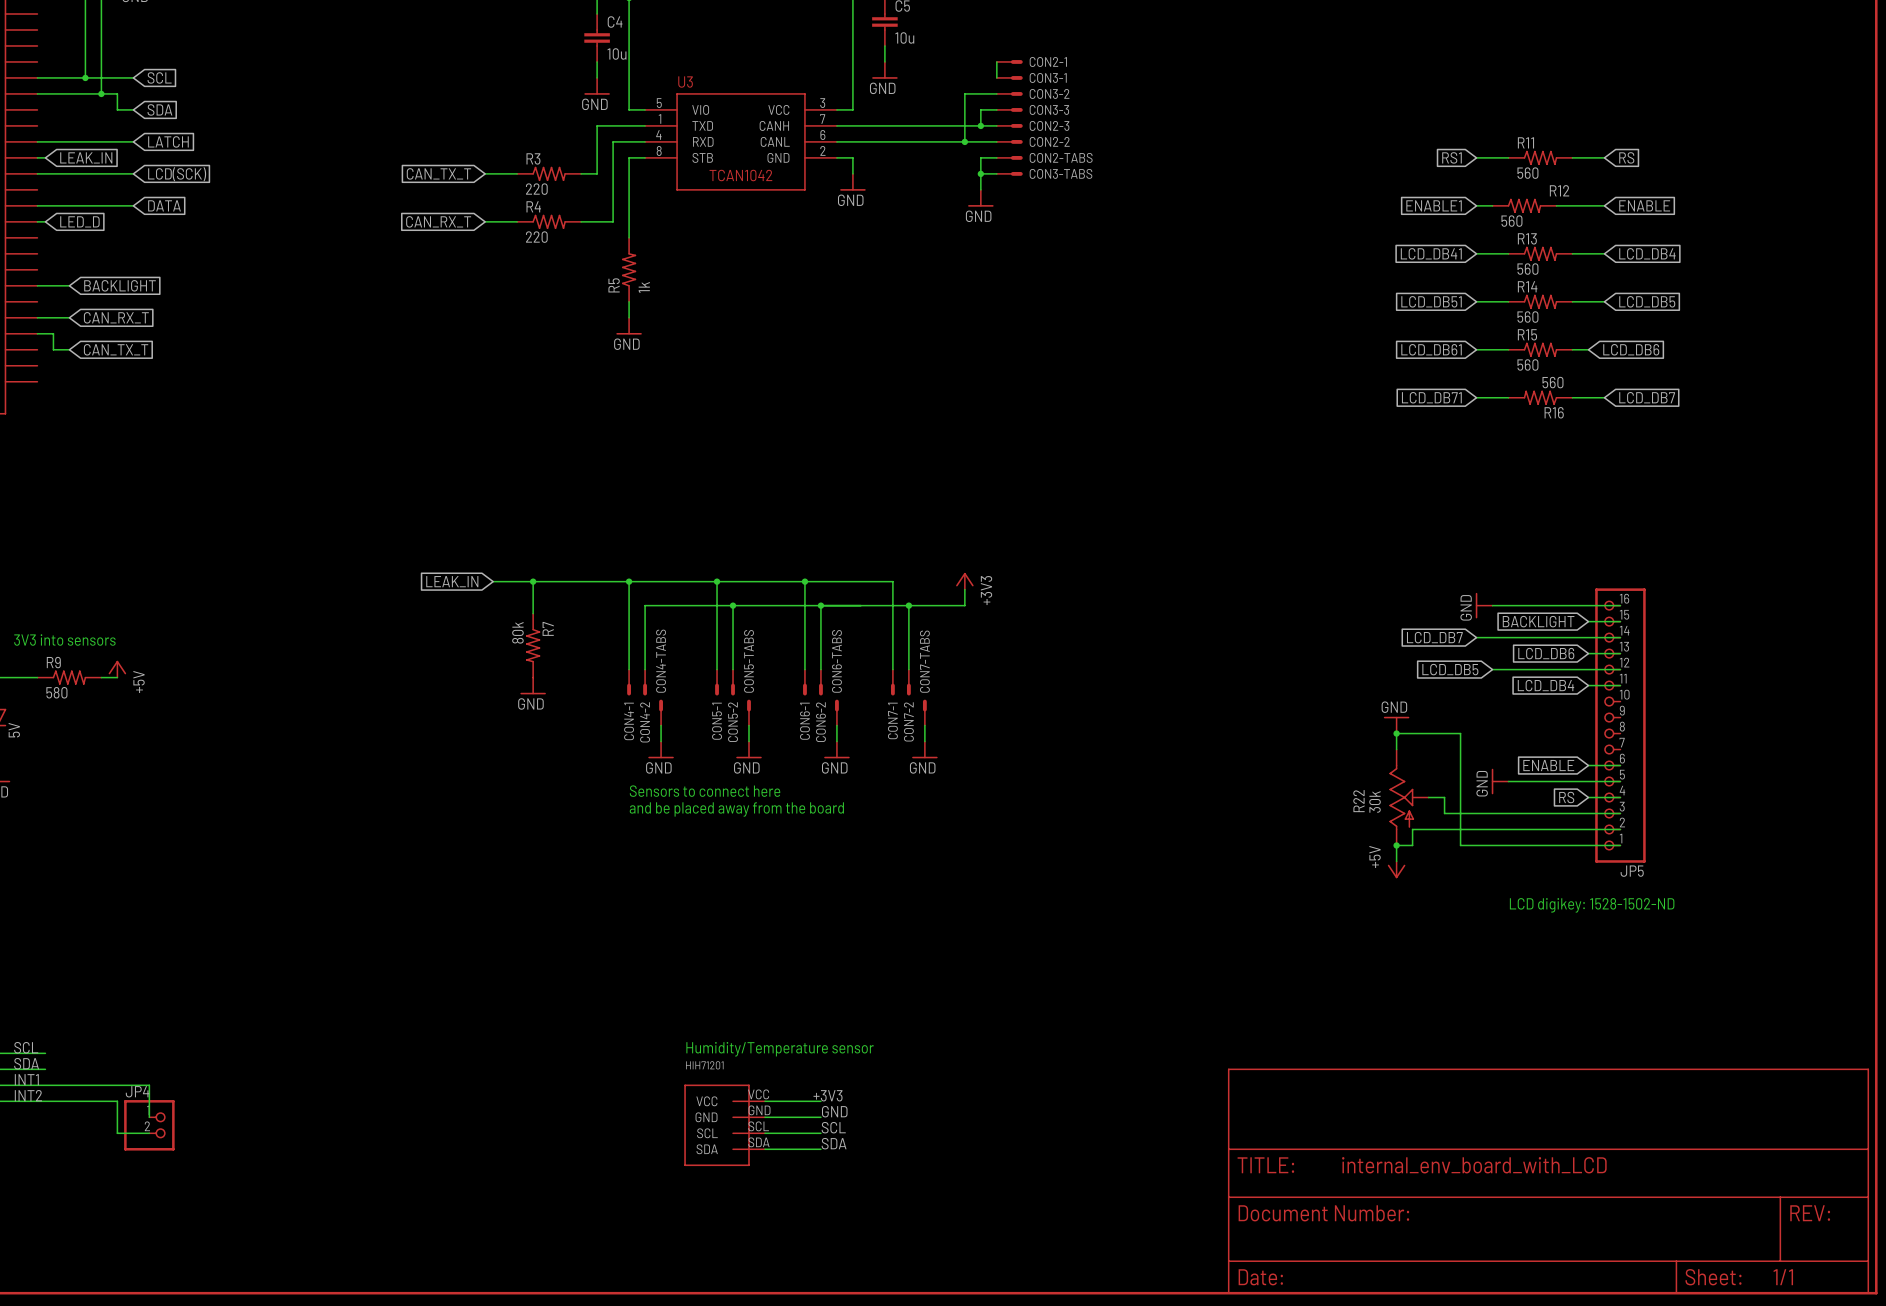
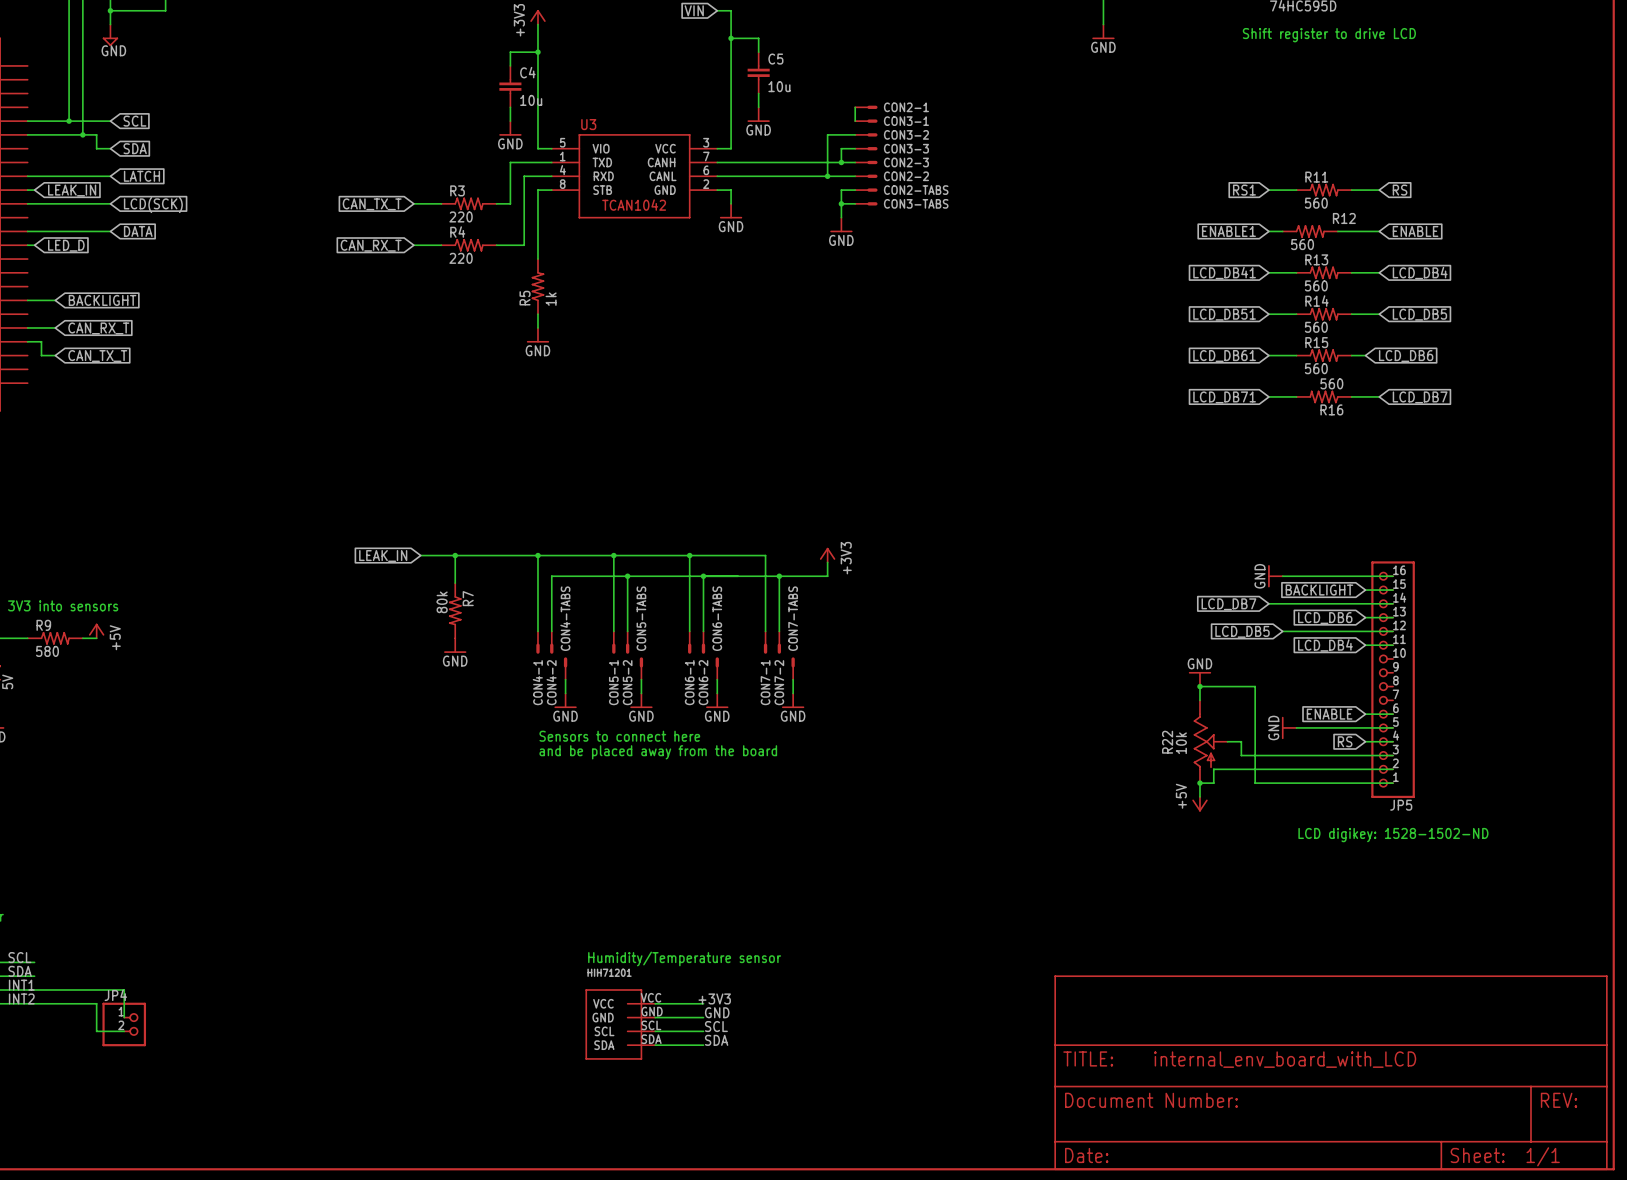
R22 value: 30k (1375, 801) -> 10k (1181, 743)

